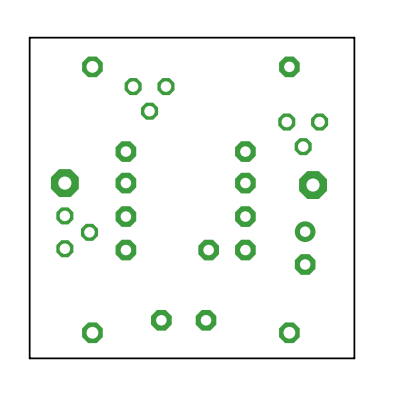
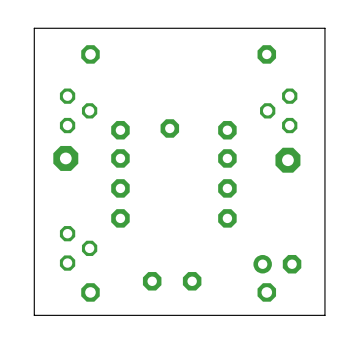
part: (149, 98) -> none
part: none -> (78, 110)
part rotation: 0° (303, 134) -> 90° clockwise (278, 110)
part: (77, 232) -> none
part rotation: 0° (305, 248) -> 90° counterclockwise (277, 264)
part position: (305, 248) -> (277, 264)
part position: (208, 250) -> (169, 128)
part: none -> (78, 248)

